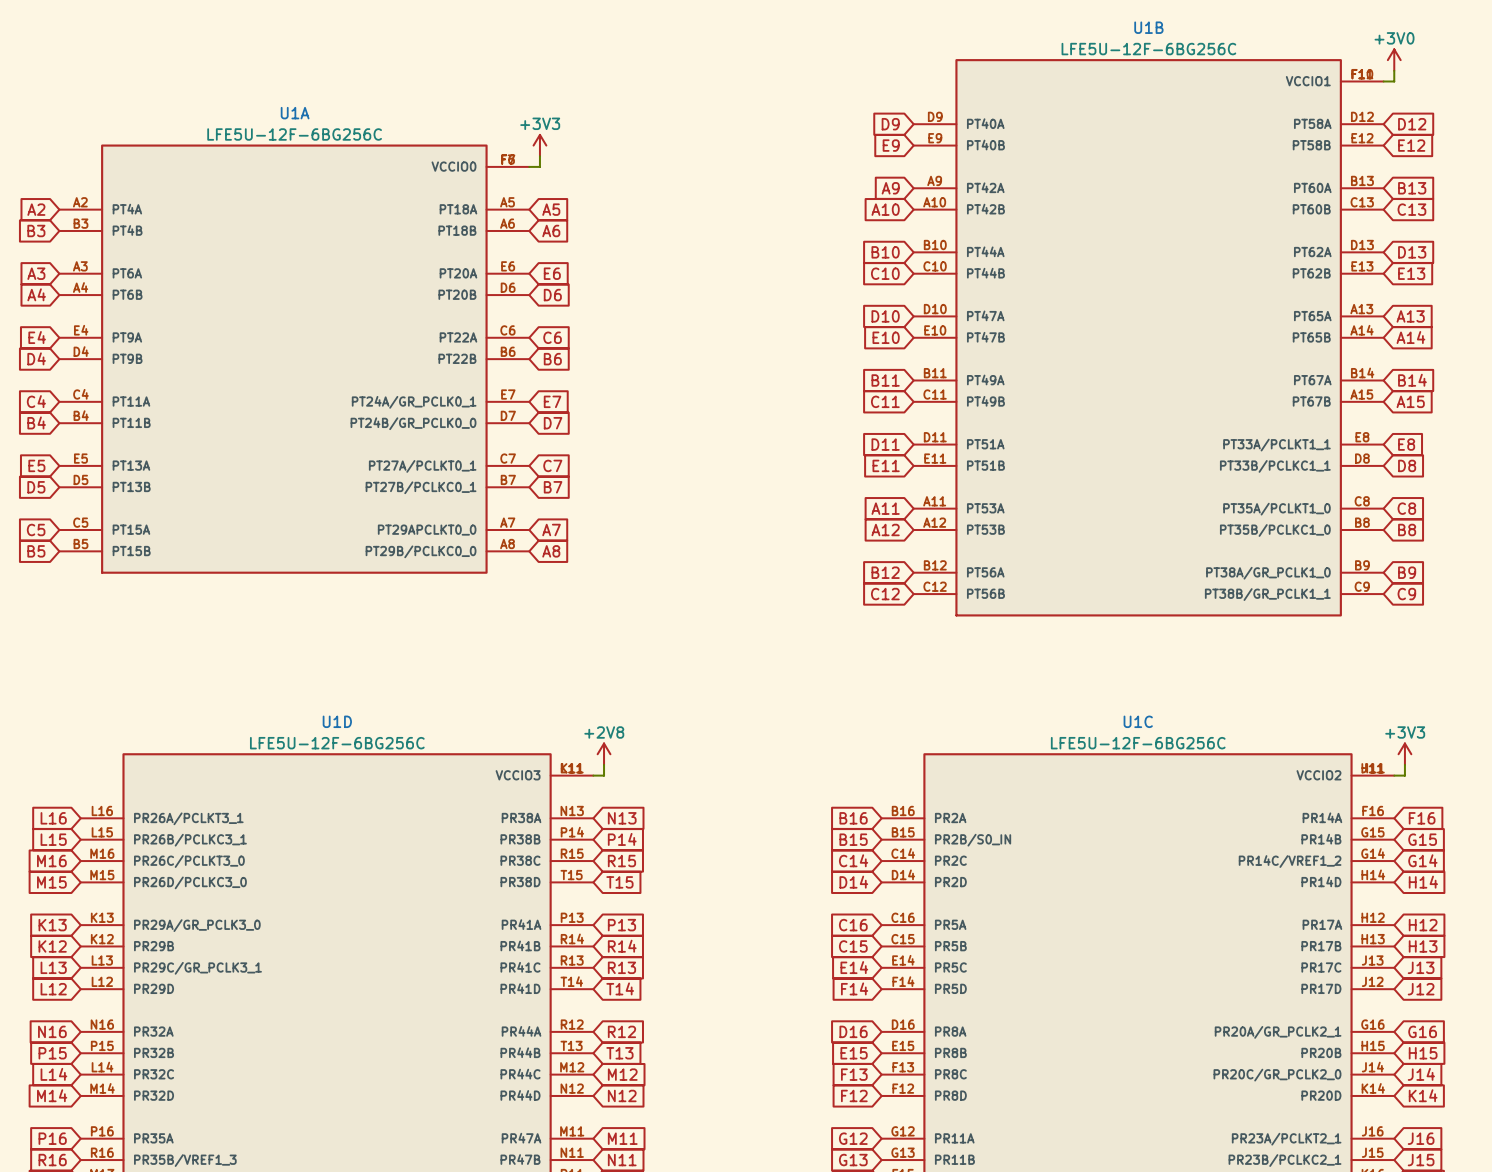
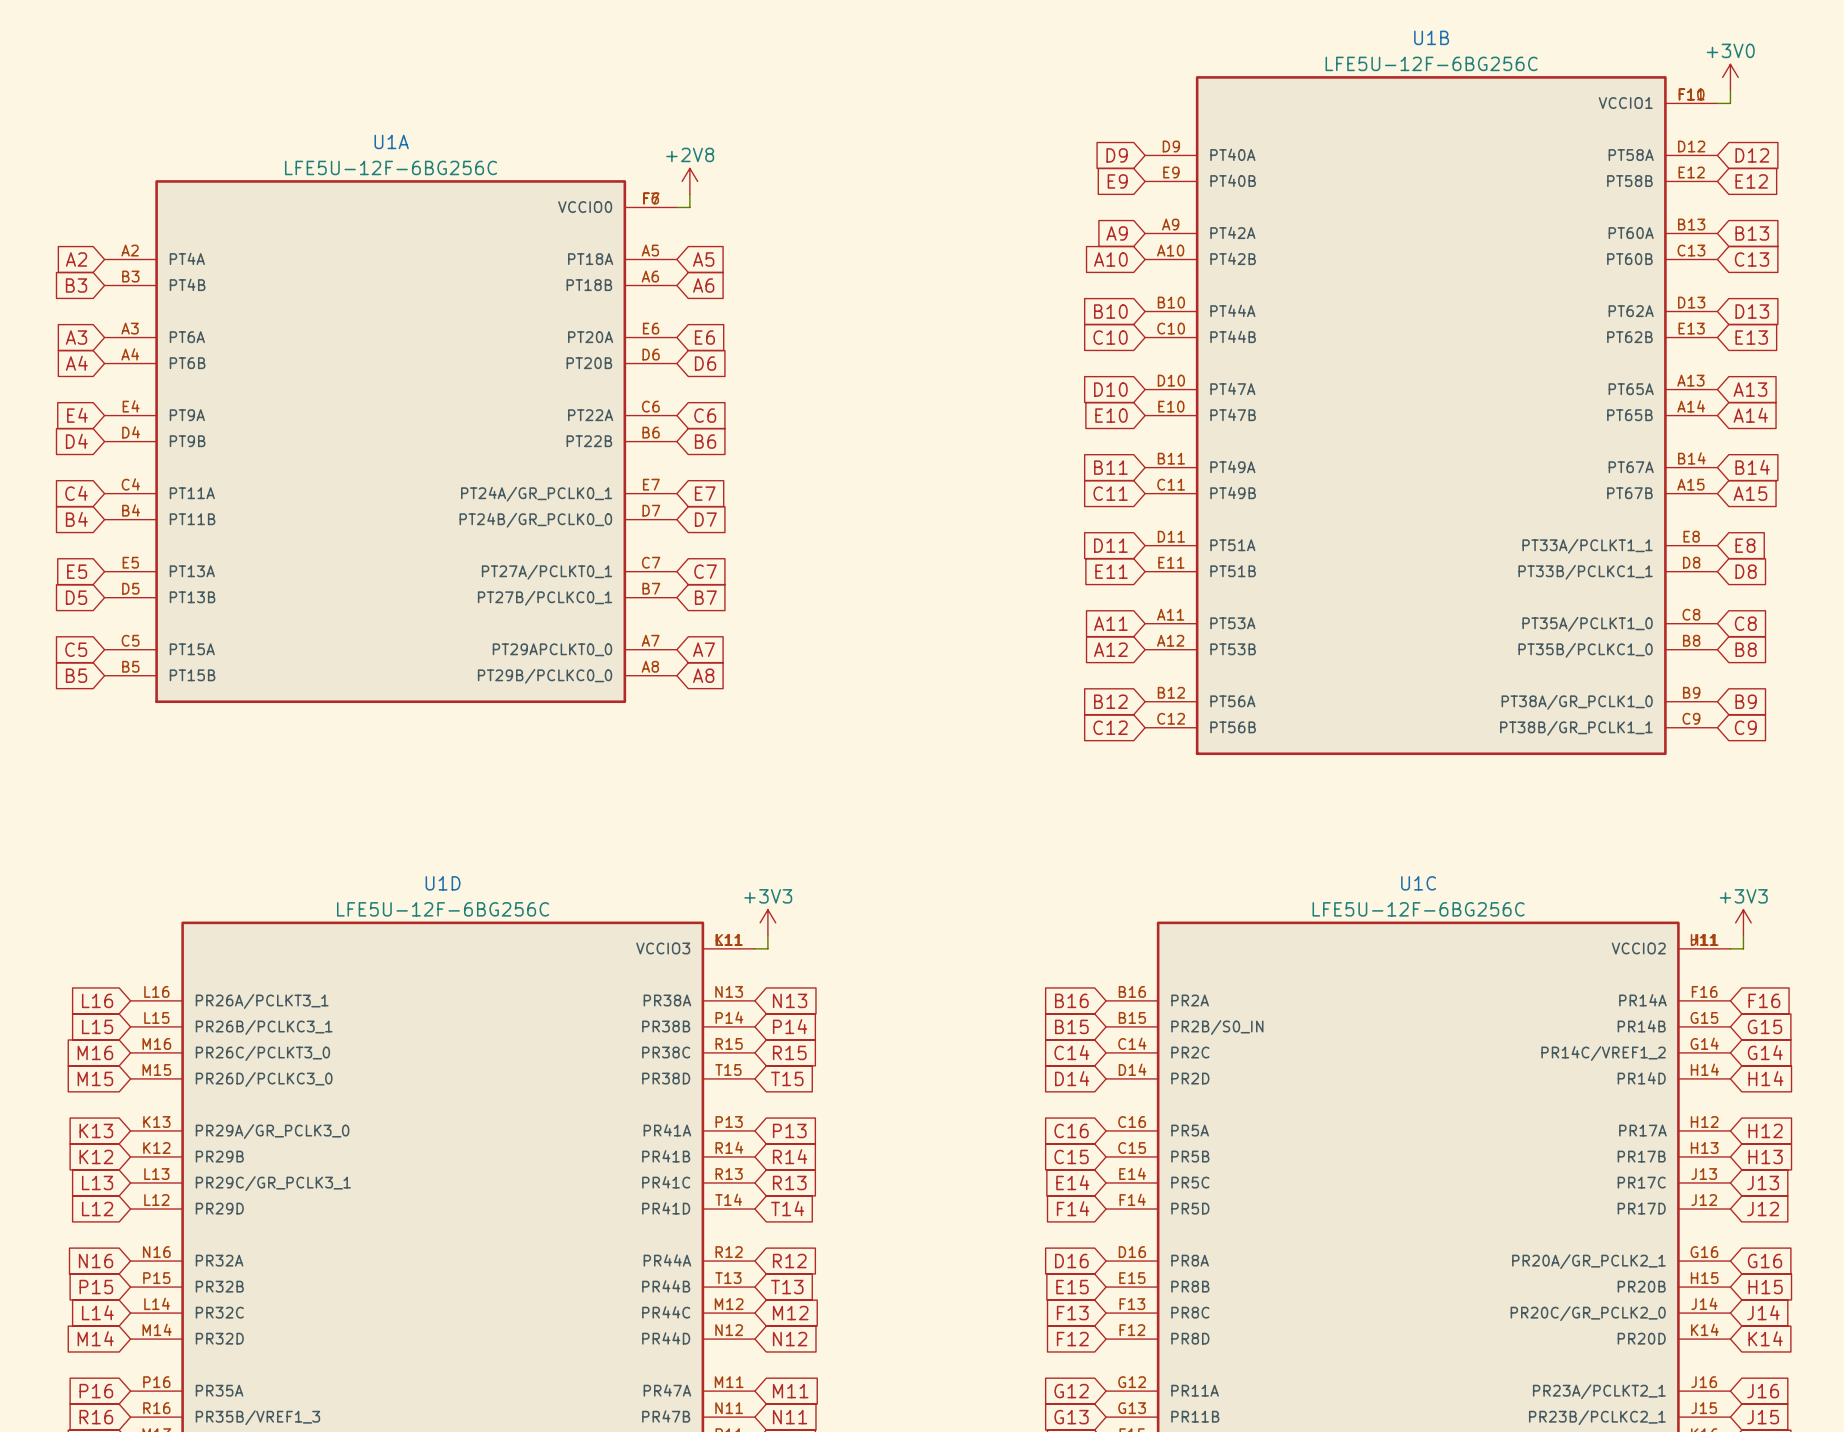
power symbol: +3V3 (539, 145) -> +2V8 (689, 181)
power symbol: +2V8 (604, 754) -> +3V3 (767, 922)

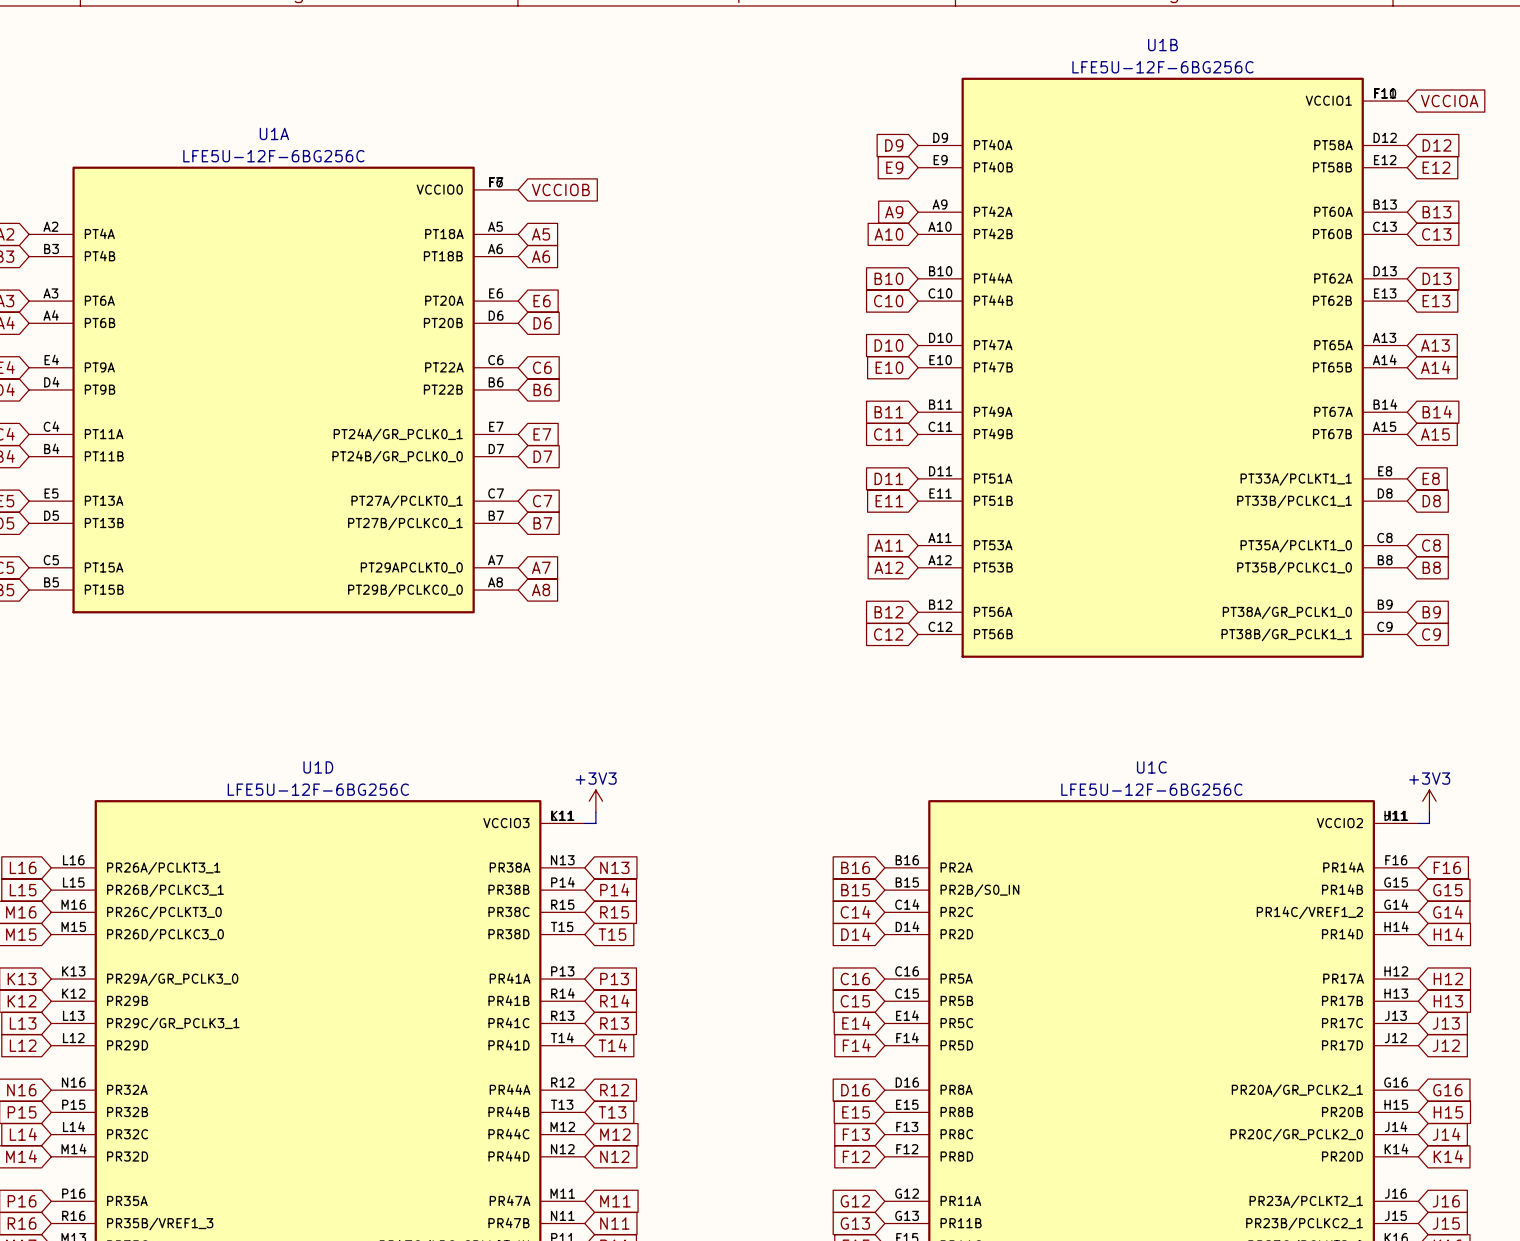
power symbol: +3V0 (1730, 77) -> none
wire: (1730, 90) (1730, 103) (1717, 103) -> none
global label: none -> VCCIOA (1449, 101)
power symbol: +2V8 (689, 181) -> none
wire: (689, 194) (689, 207) (676, 207) -> none
global label: none -> VCCIOB (560, 189)

